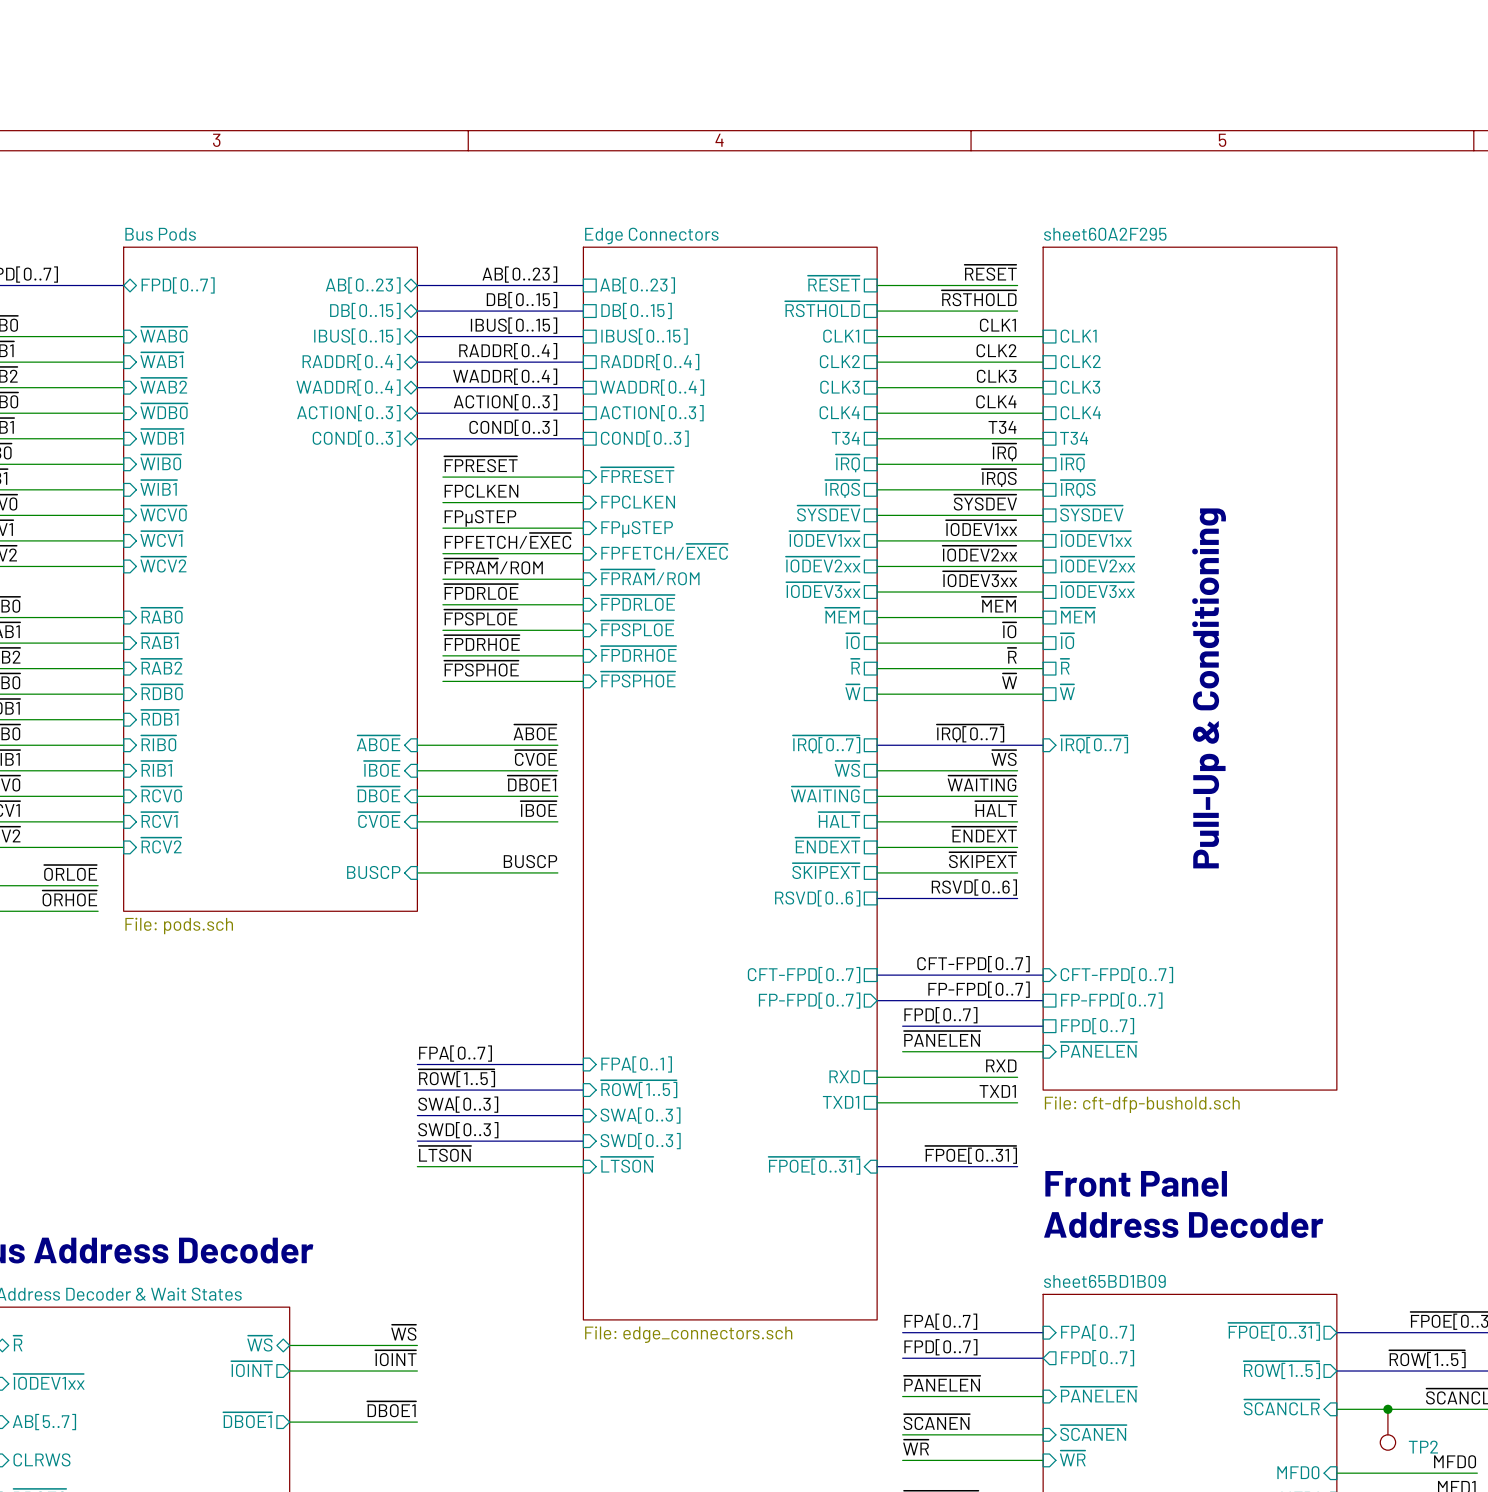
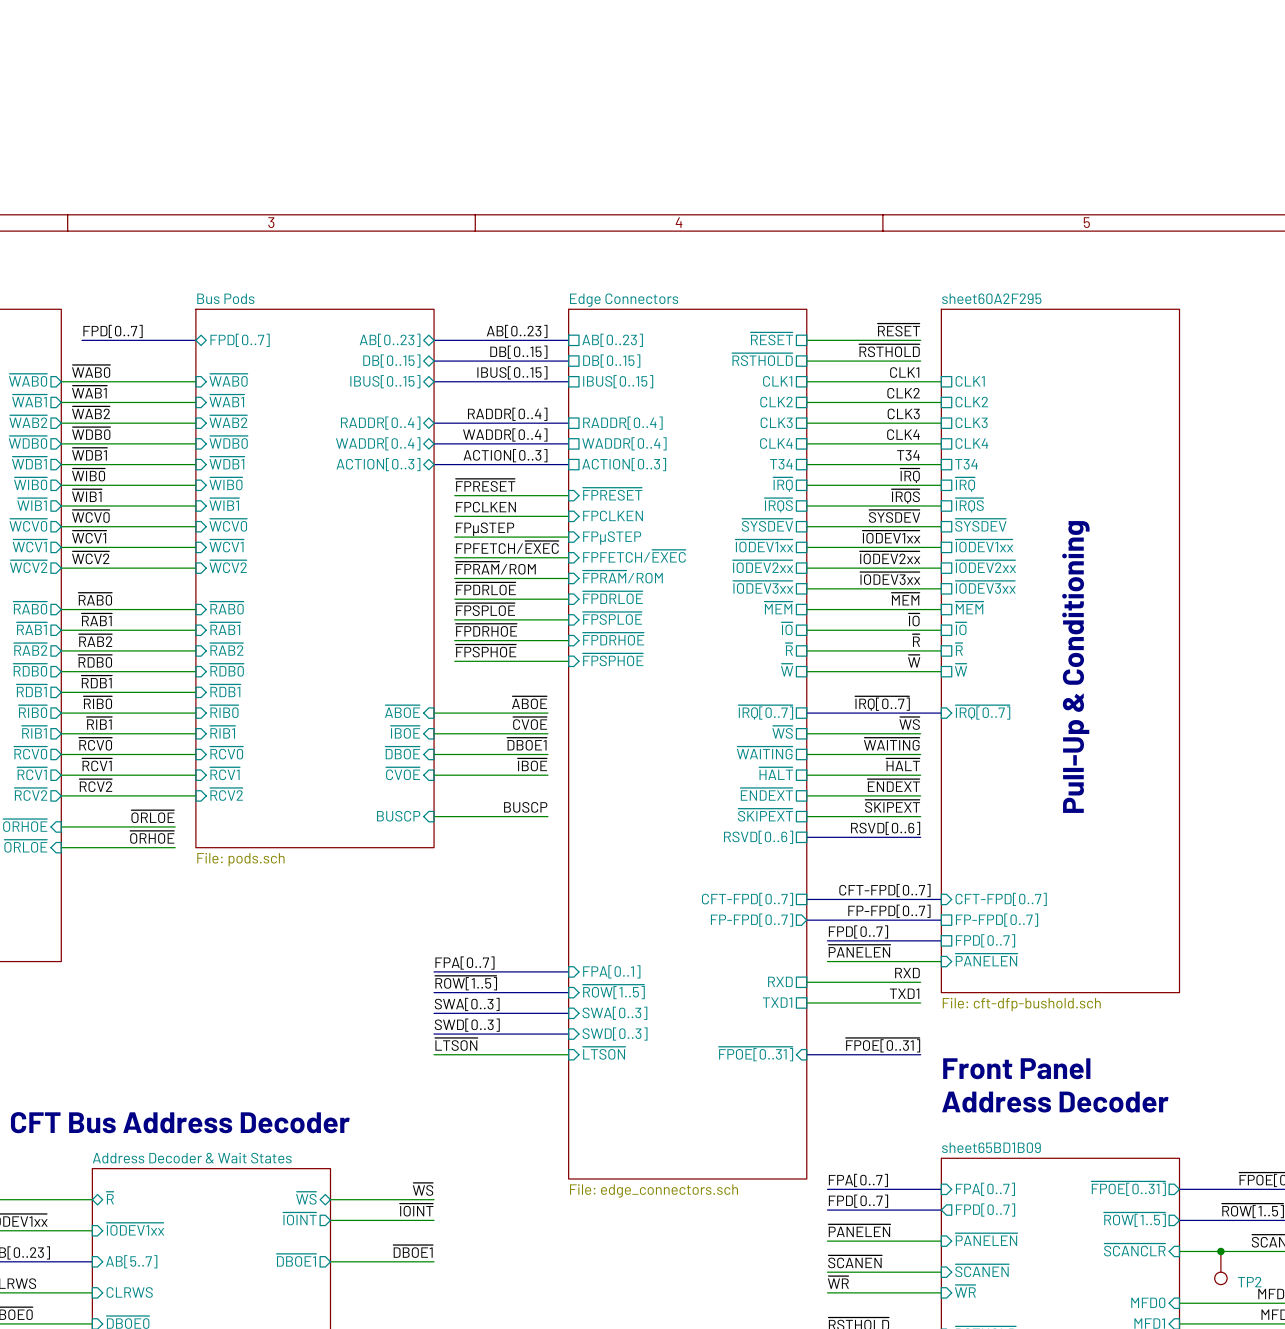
label: RADDR[0..4] (508, 351) -> none
sheet pin: RADDR[0..4] (351, 362) -> none
bus: (417, 362) (583, 362) -> none
sheet pin: RADDR[0..4] (650, 362) -> none
label: WADDR[0..4] (505, 376) -> RADDR[0..4] (507, 414)
sheet pin: WADDR[0..4] (348, 387) -> RADDR[0..4] (380, 423)
sheet pin: WADDR[0..4] (652, 387) -> RADDR[0..4] (622, 423)
label: ACTION[0..3] (505, 402) -> WADDR[0..4] (505, 434)
sheet pin: ACTION[0..3] (348, 413) -> WADDR[0..4] (378, 443)
sheet pin: ACTION[0..3] (651, 413) -> WADDR[0..4] (624, 443)
label: COND[0..3] (513, 427) -> ACTION[0..3] (505, 455)
sheet pin: COND[0..3] (356, 438) -> ACTION[0..3] (378, 464)
sheet pin: COND[0..3] (644, 438) -> ACTION[0..3] (624, 464)

